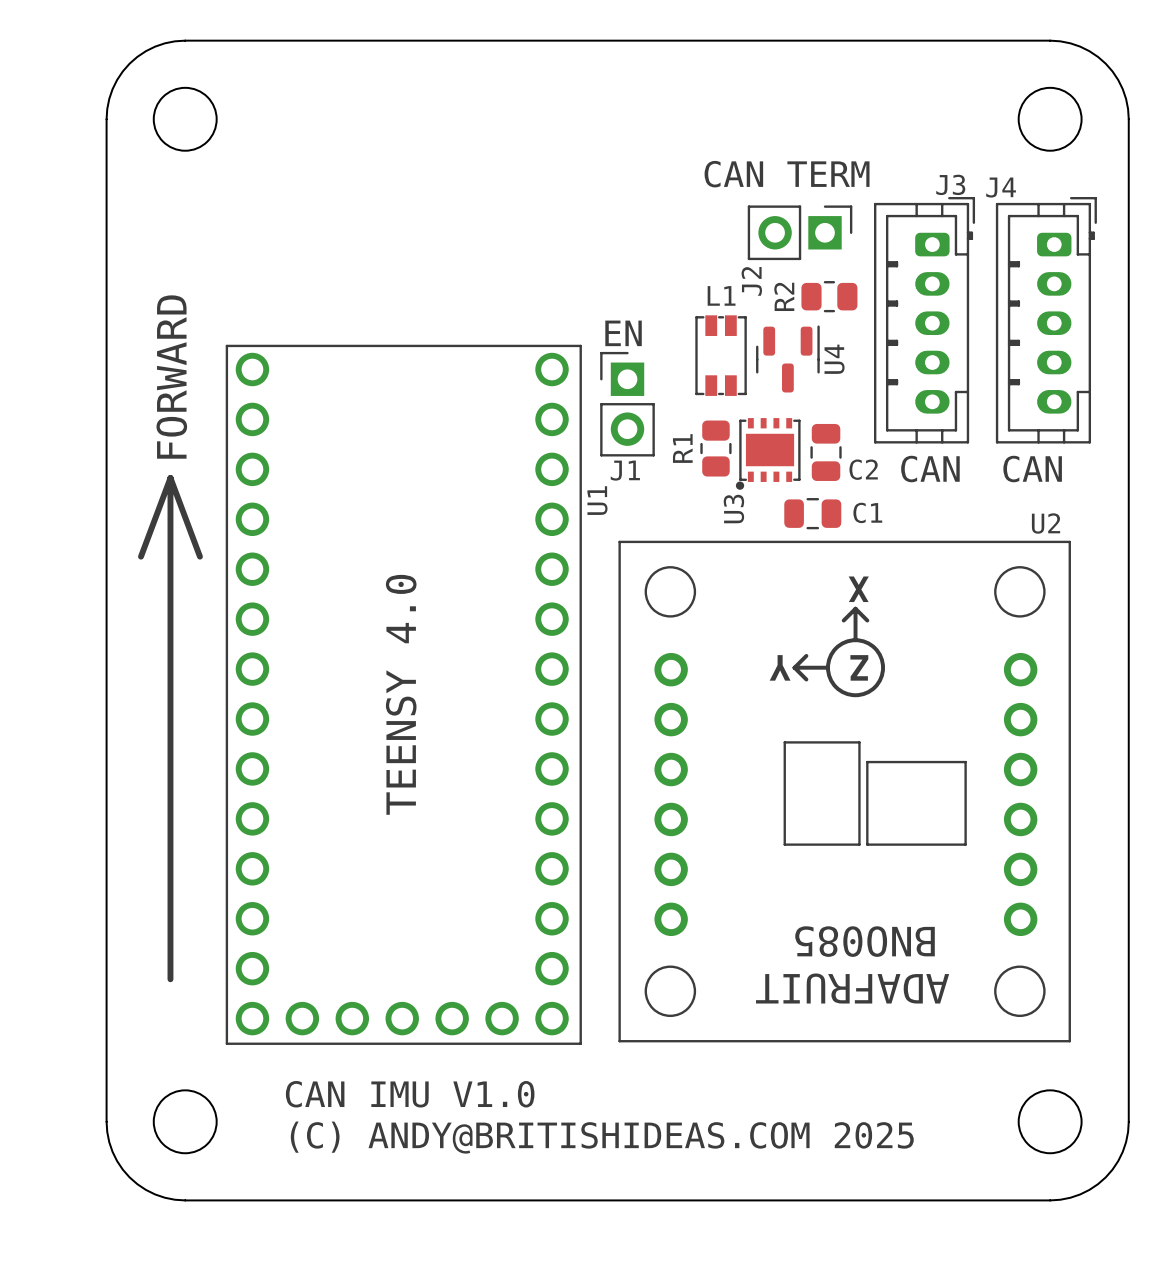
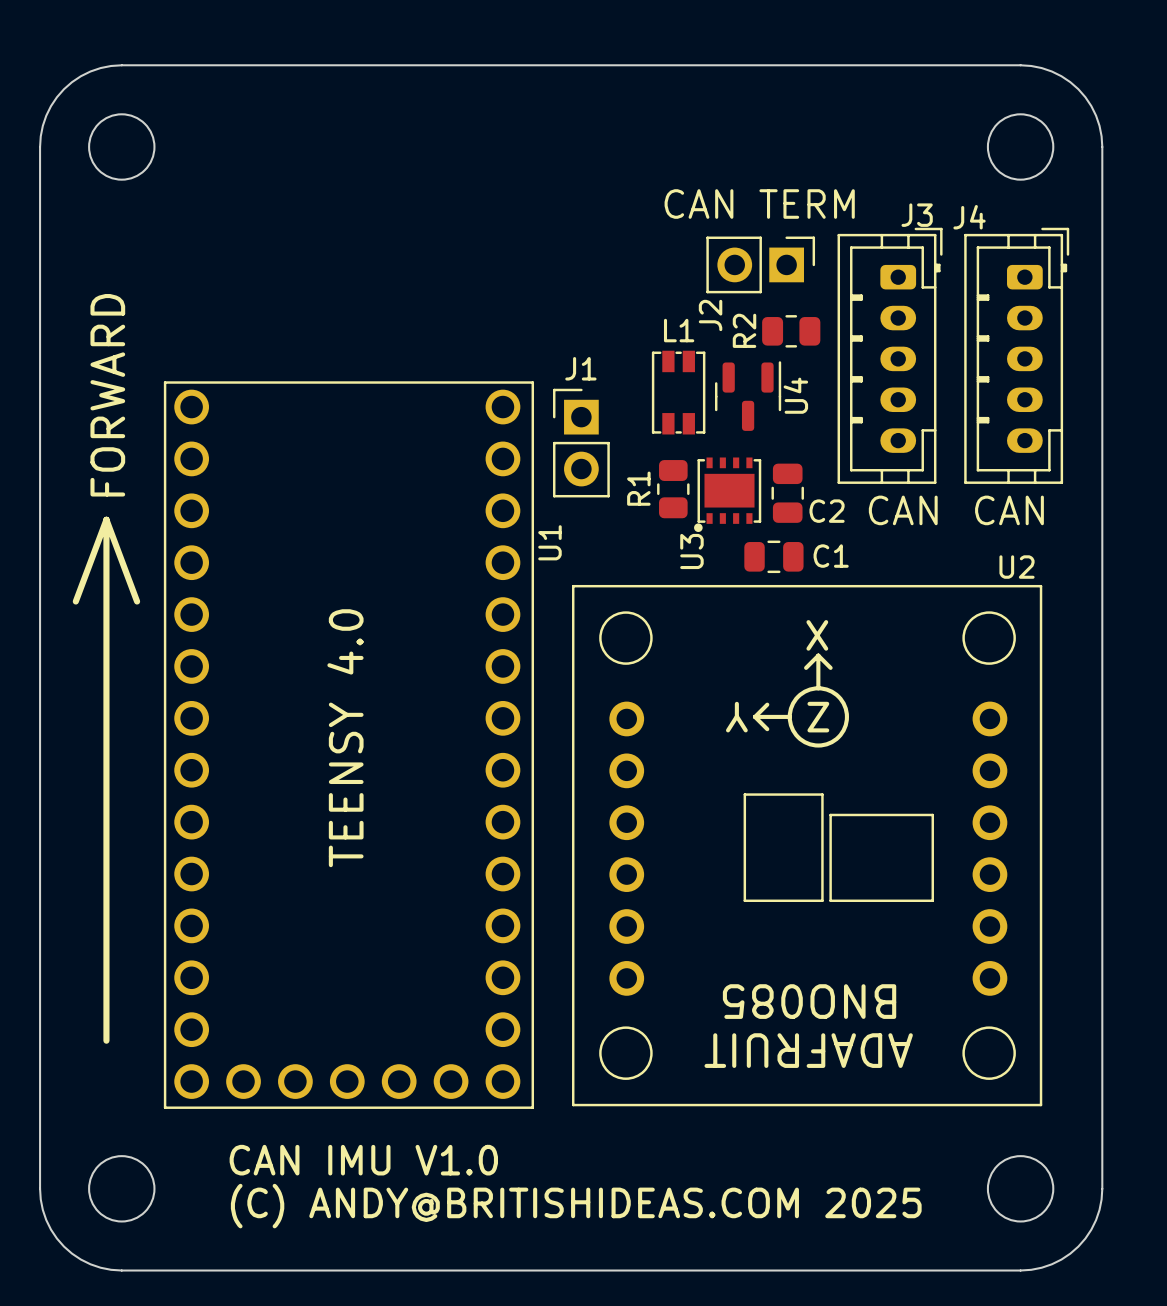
text: EN (623, 333) -> none
J1 name position: J1 (625, 470) -> J1 (580, 368)

